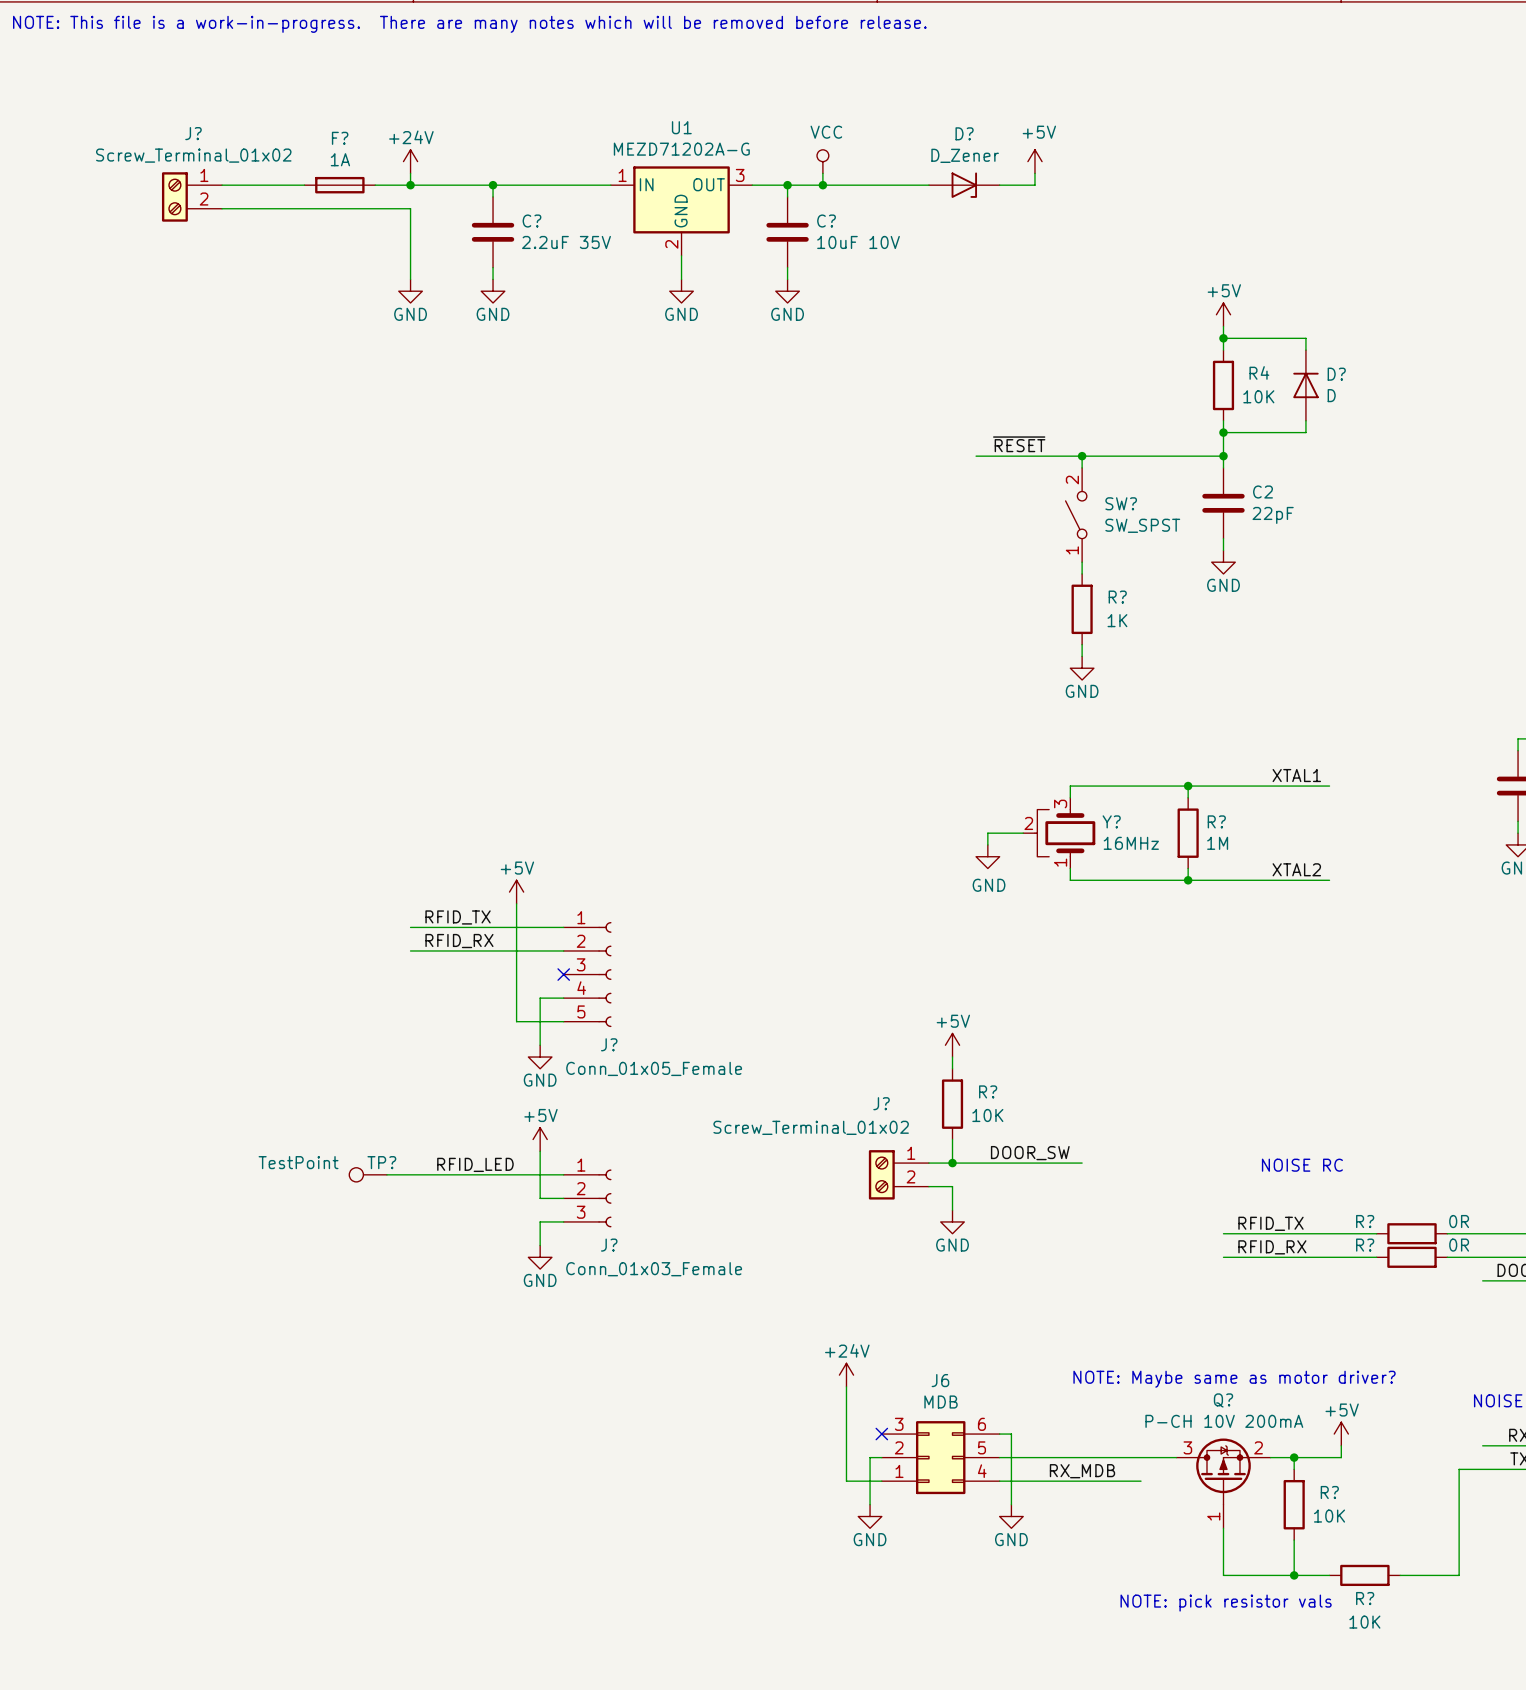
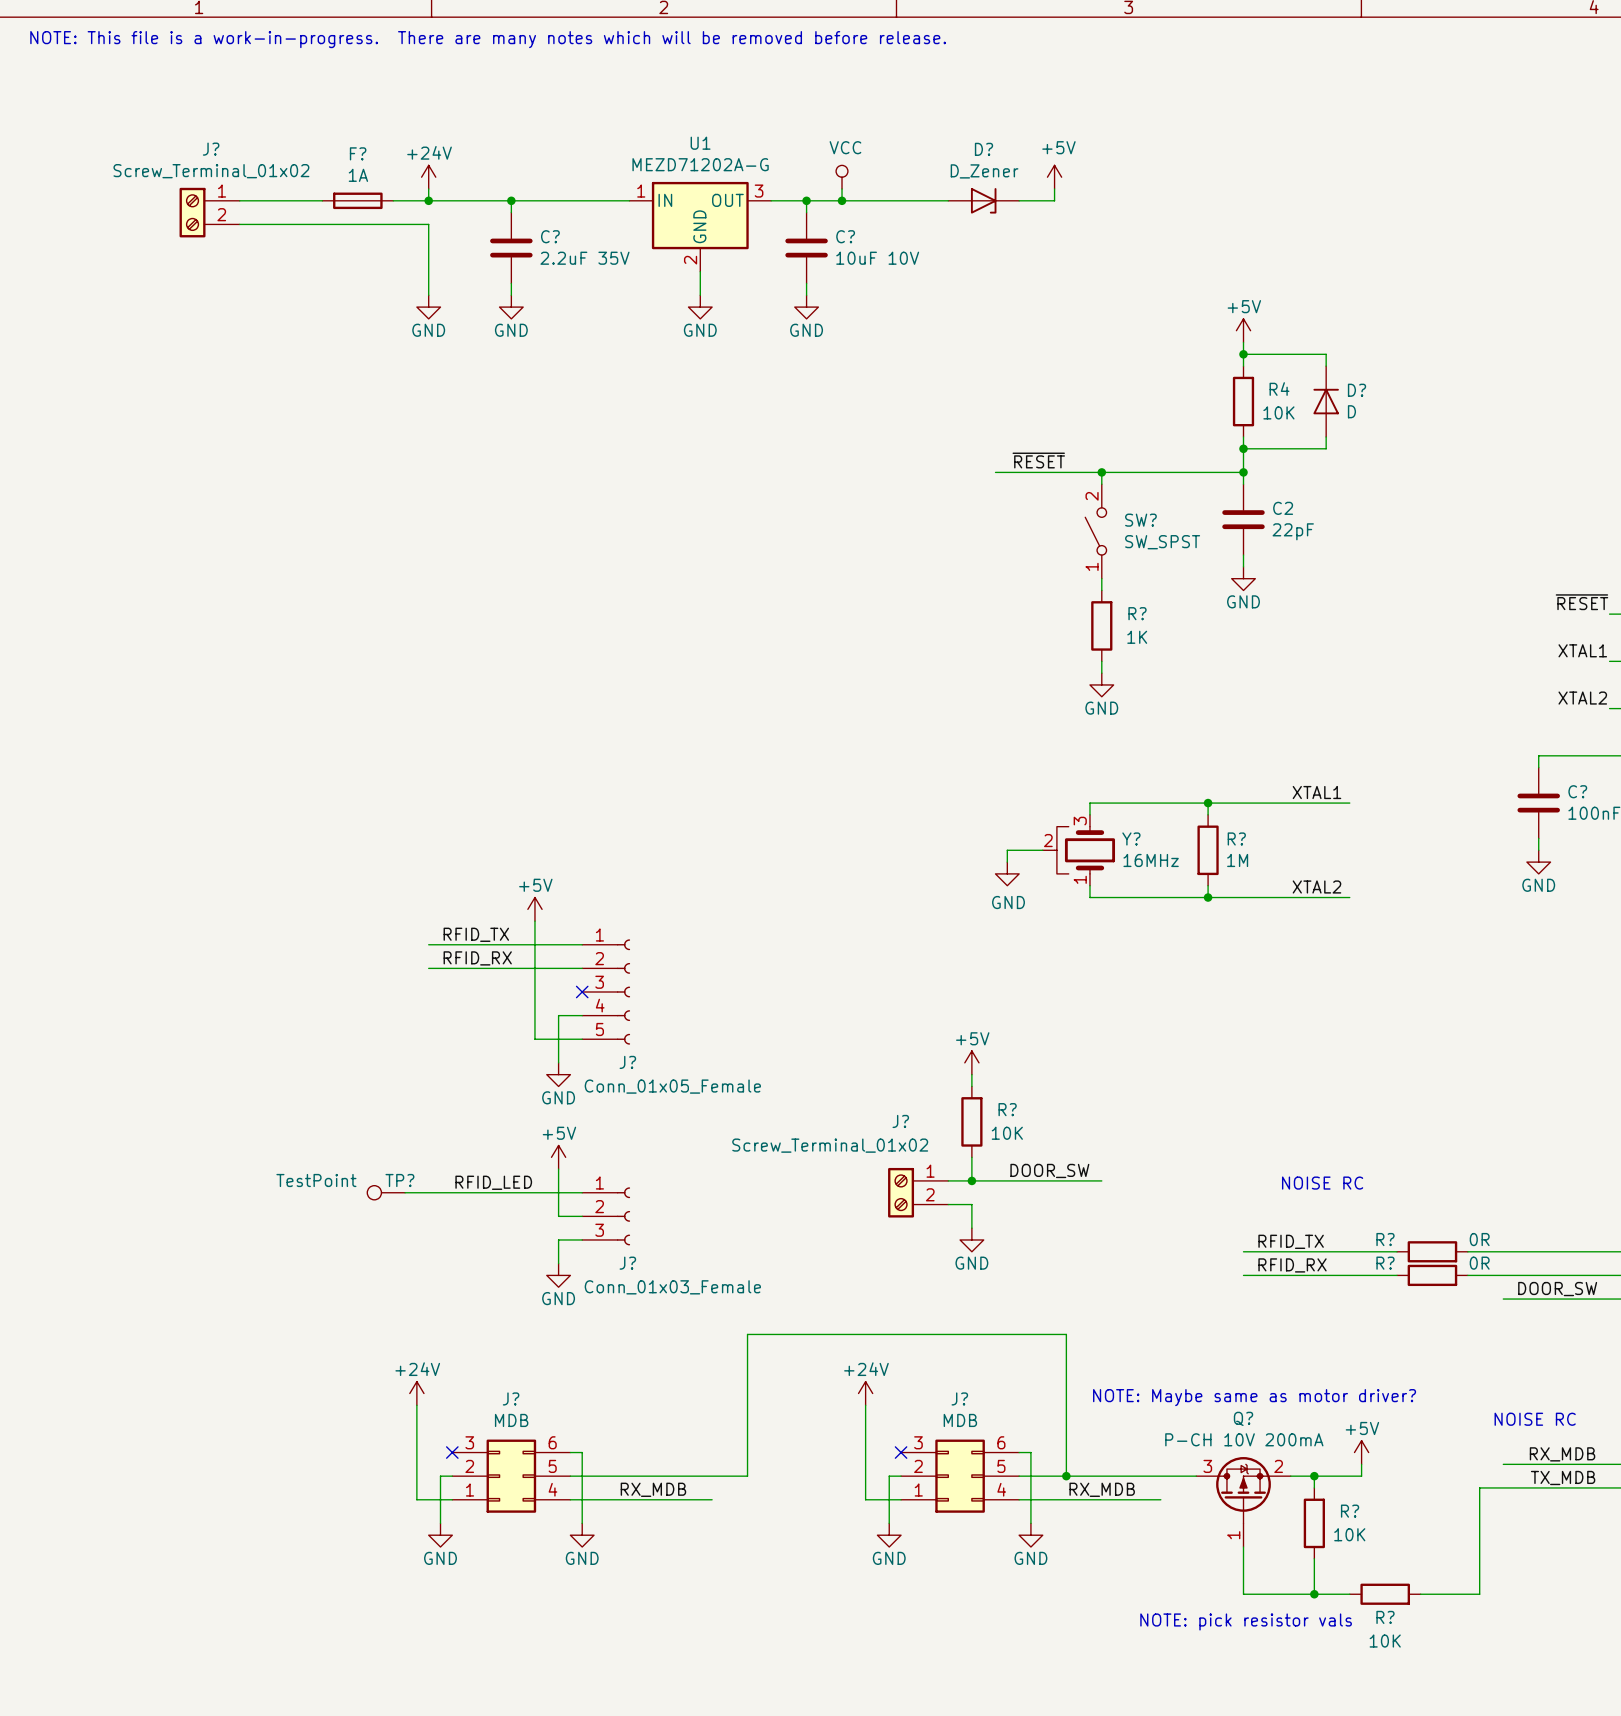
power symbol: none -> +24V (416, 1393)
J6 name: J6 (940, 1380) -> J? (959, 1398)
wire: none -> (416, 1405) (416, 1499) (452, 1499)
no-connect mark: none -> (452, 1452)
wire: none -> (570, 1452) (582, 1452) (582, 1523)
wire: none -> (452, 1476) (440, 1476) (440, 1523)
J?: none -> MDB (511, 1476)
wire: none -> (570, 1476) (747, 1476) (747, 1334) (1066, 1334) (1066, 1476)
junction: none -> (1066, 1476)
label: none -> RX_MDB (653, 1489)
wire: none -> (570, 1499) (712, 1499)
power symbol: none -> GND (440, 1535)
power symbol: none -> GND (582, 1535)

